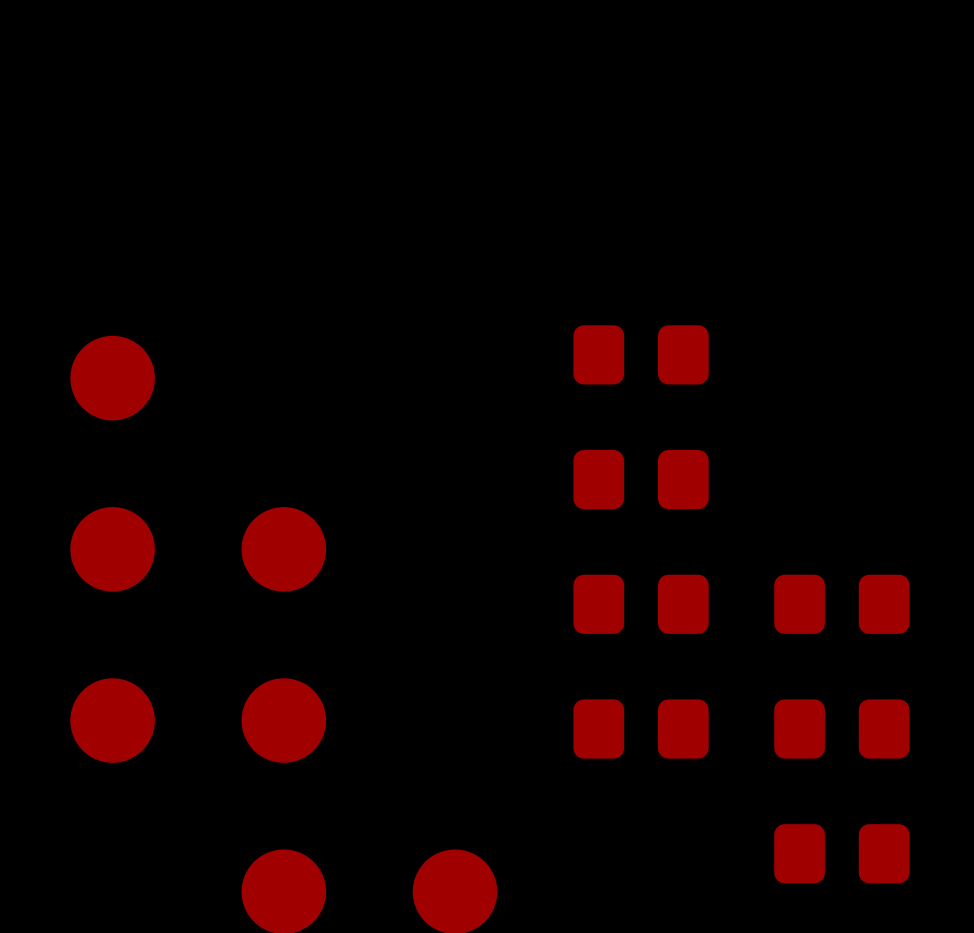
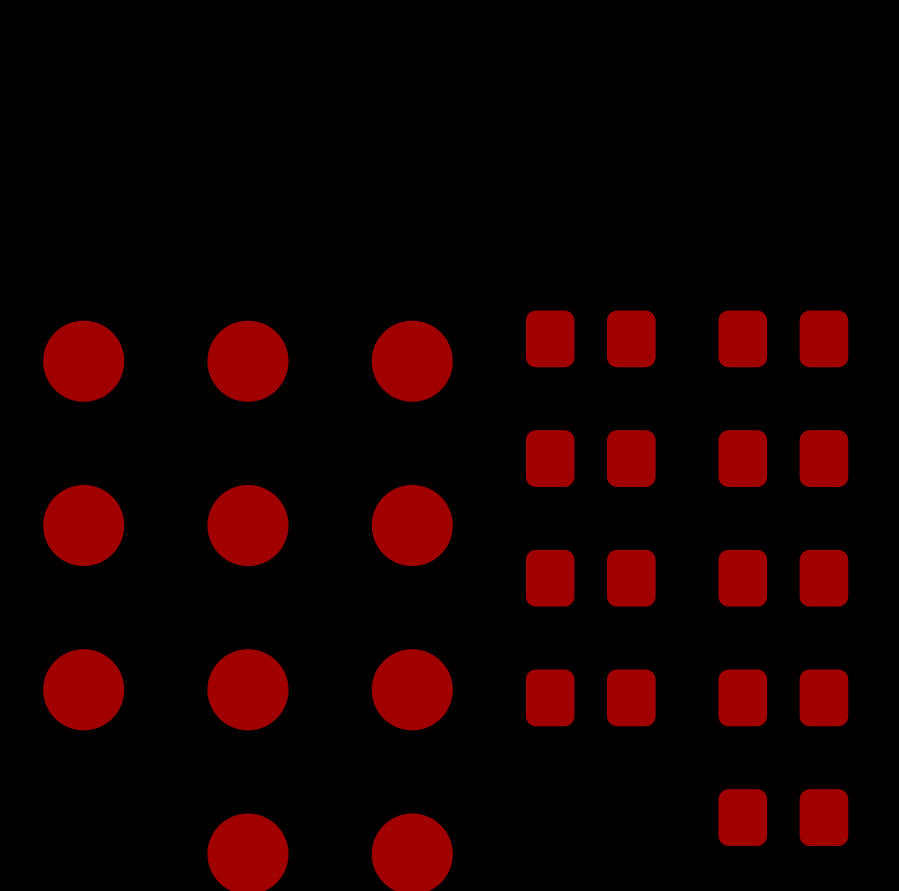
part: none -> (783, 338)
part: none -> (247, 361)
part: none -> (412, 361)
part: none -> (783, 458)
part: none -> (412, 525)
part: none -> (412, 689)

